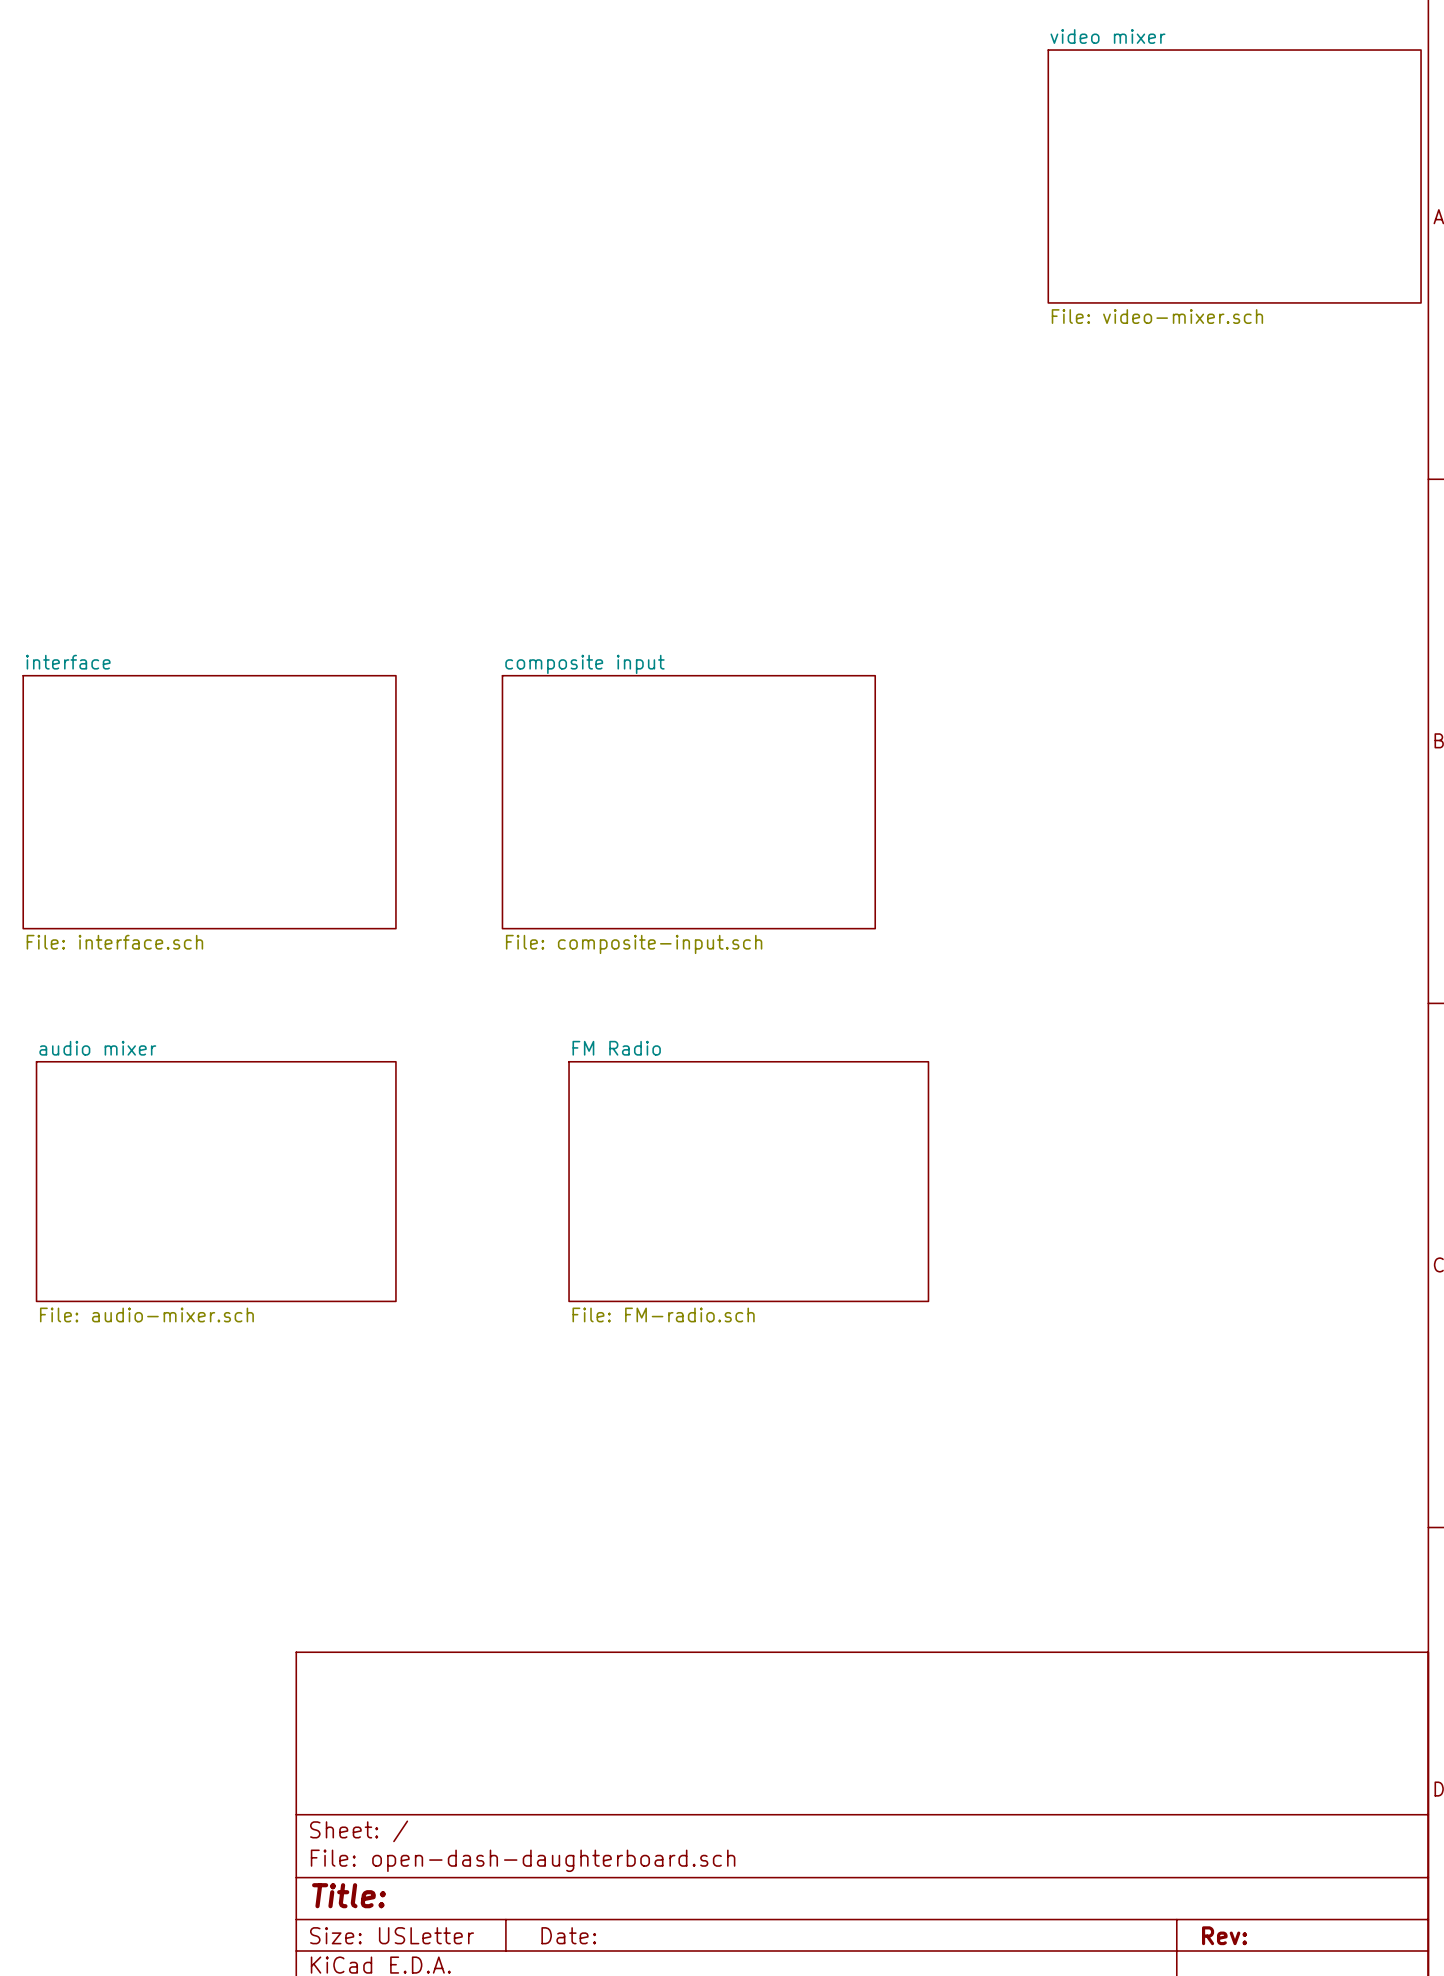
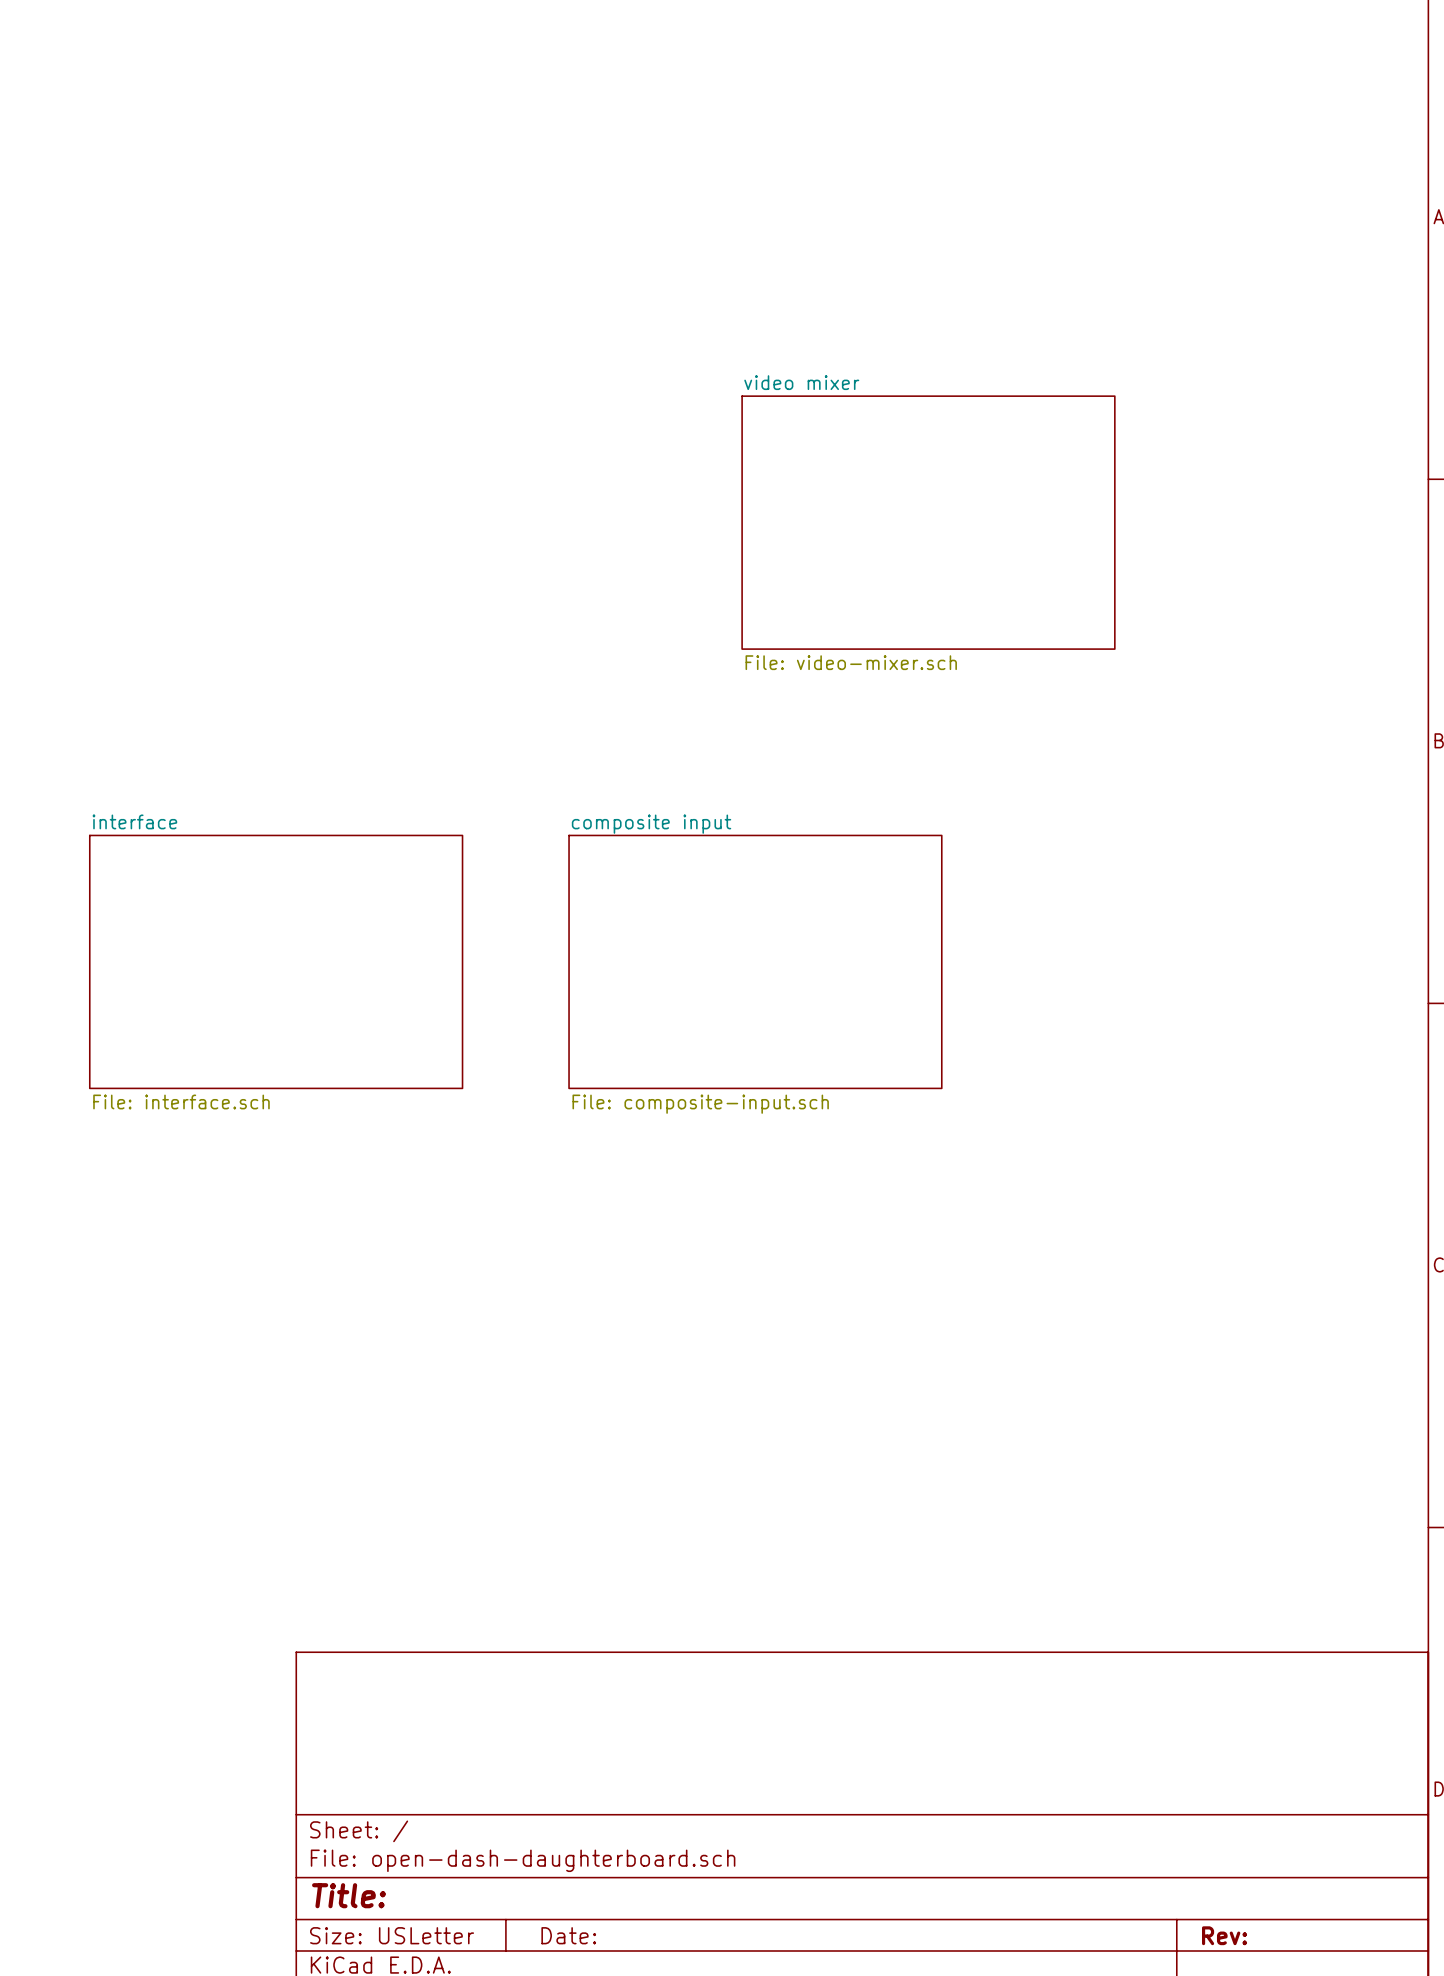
sheet video mixer: File: video-mixer.sch (1234, 176) -> none
sheet video mixer: none -> File: video-mixer.sch (928, 522)
sheet interface position: (209, 802) -> (276, 961)
sheet composite input position: (688, 802) -> (755, 961)
sheet audio mixer: File: audio-mixer.sch (216, 1181) -> none
sheet FM Radio: File: FM-radio.sch (748, 1181) -> none

